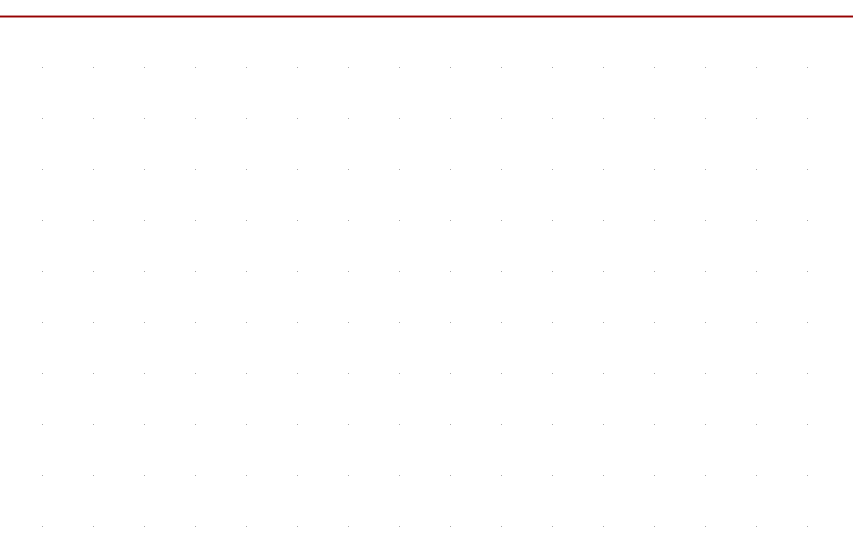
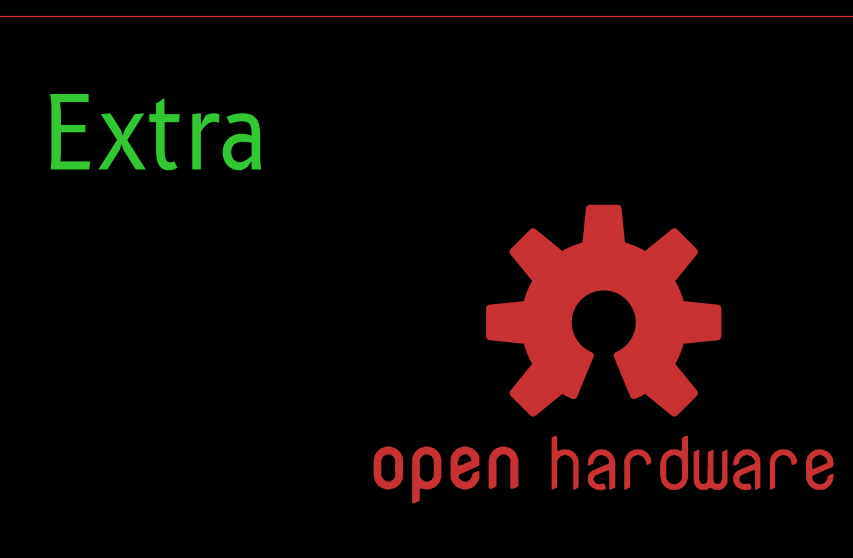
text: none -> Extra (155, 132)
part: none -> (603, 354)

